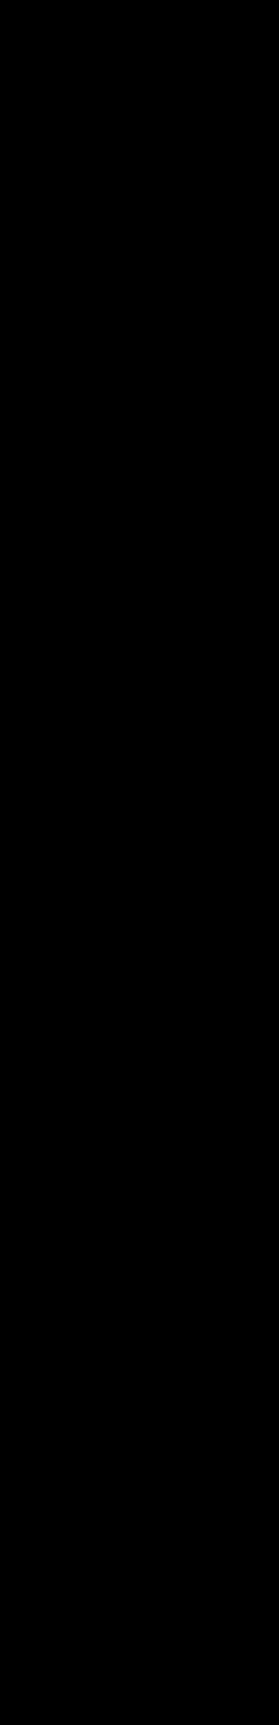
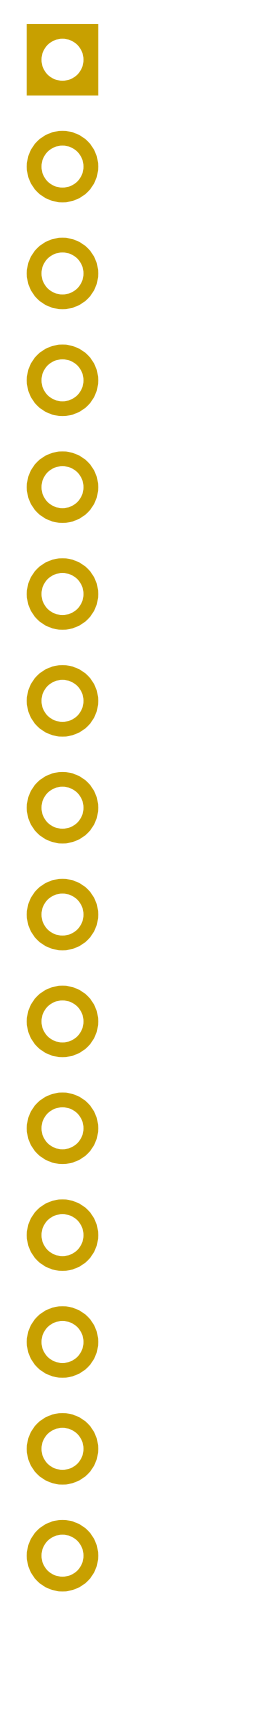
part: none -> (62, 807)

